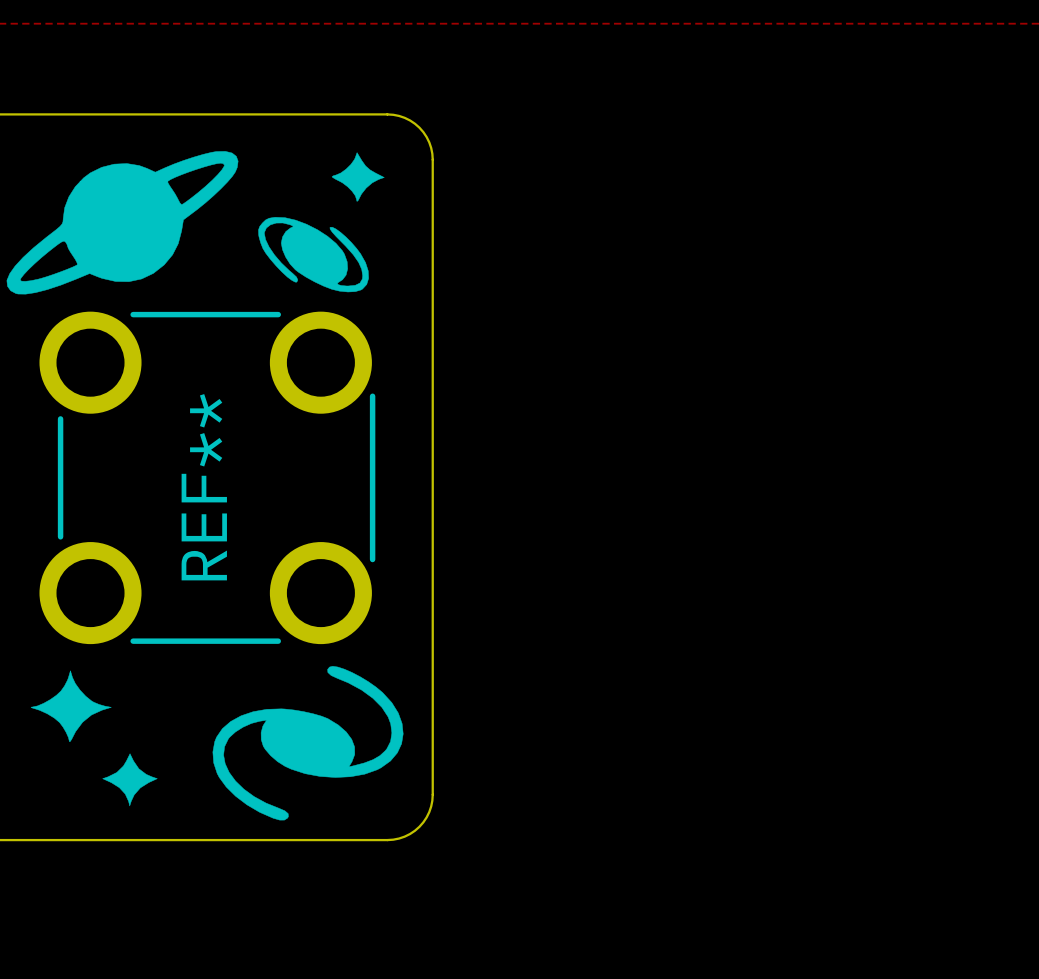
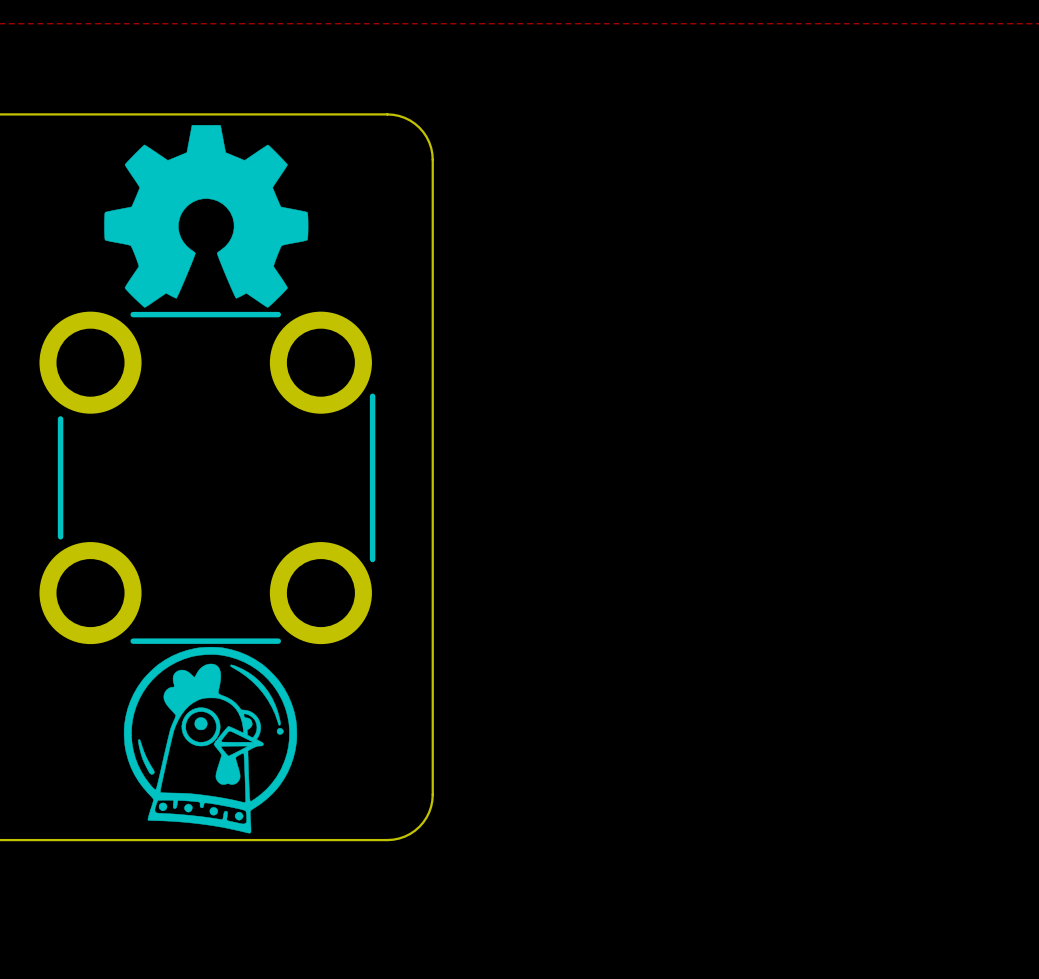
drawing: none -> [104, 125, 309, 308]
drawing: [6, 151, 404, 821] -> none
REF** name: REF** (204, 487) -> none
drawing: none -> [123, 646, 298, 834]

